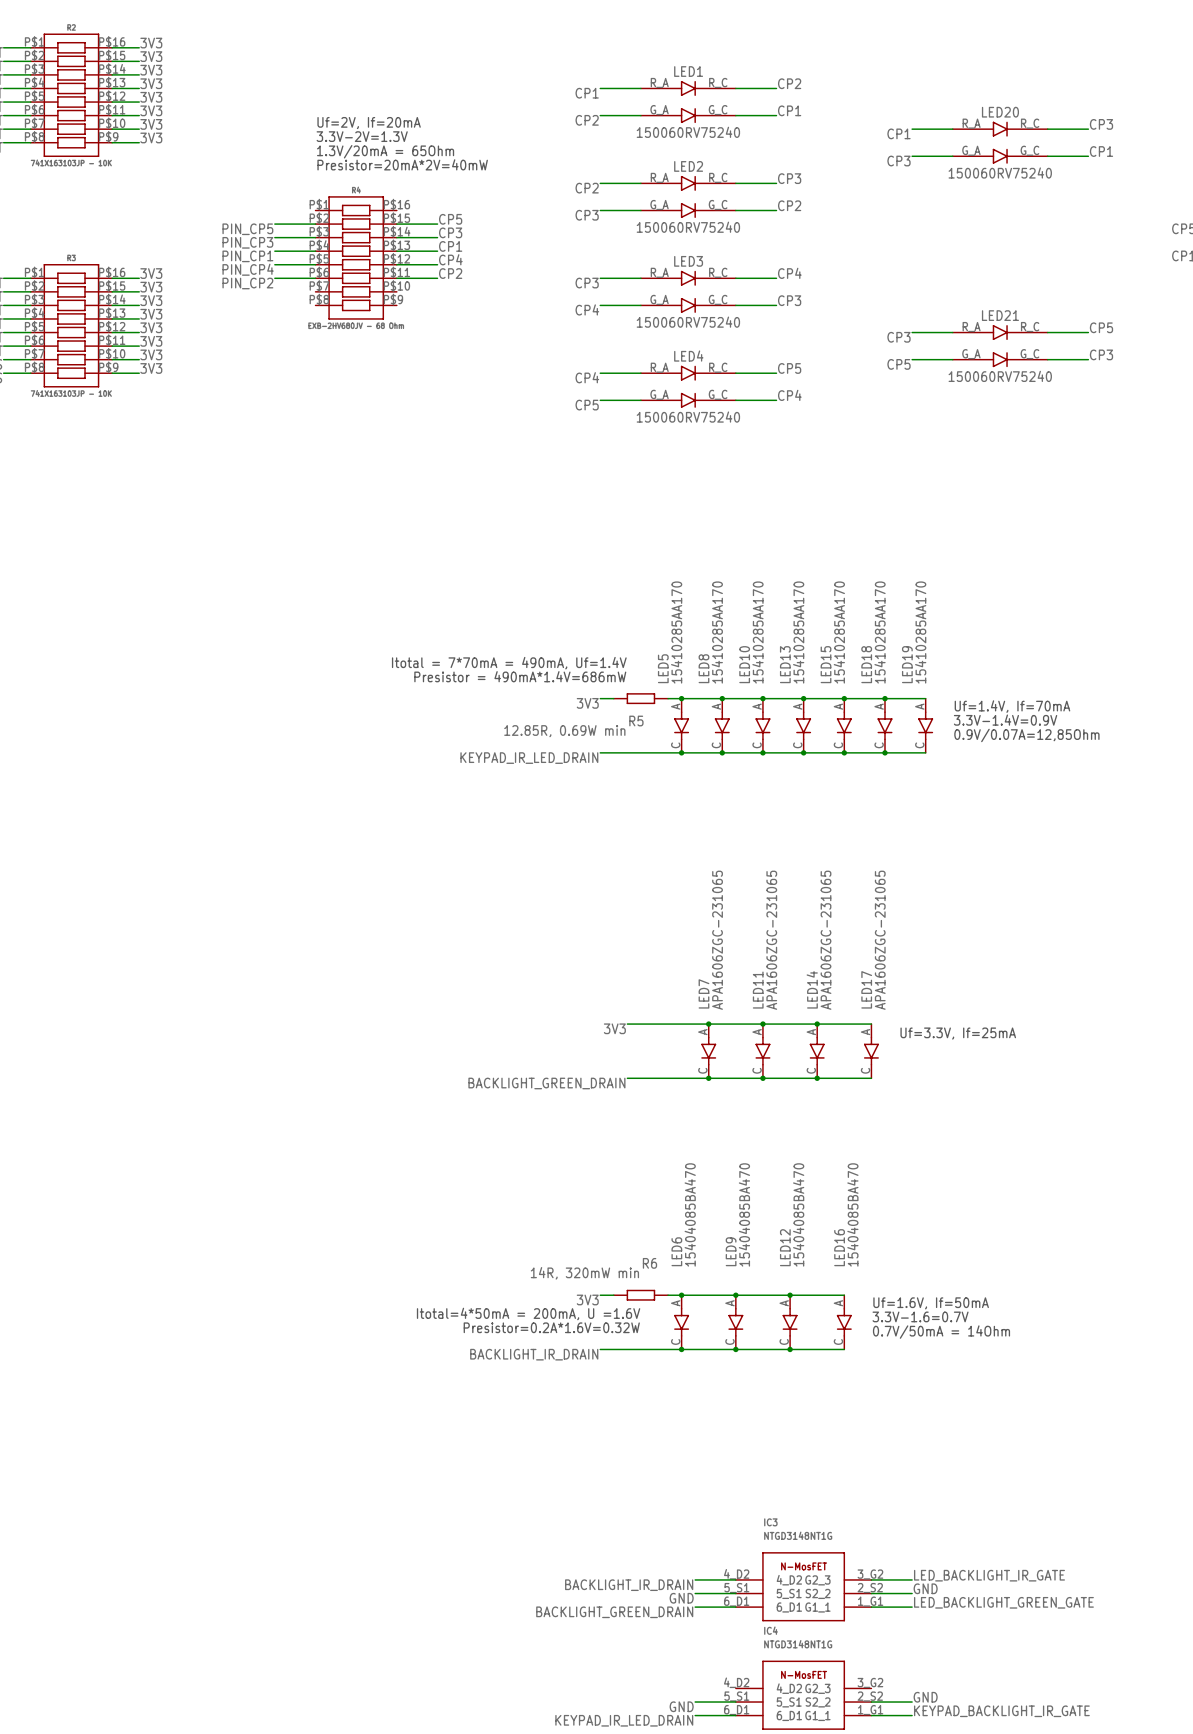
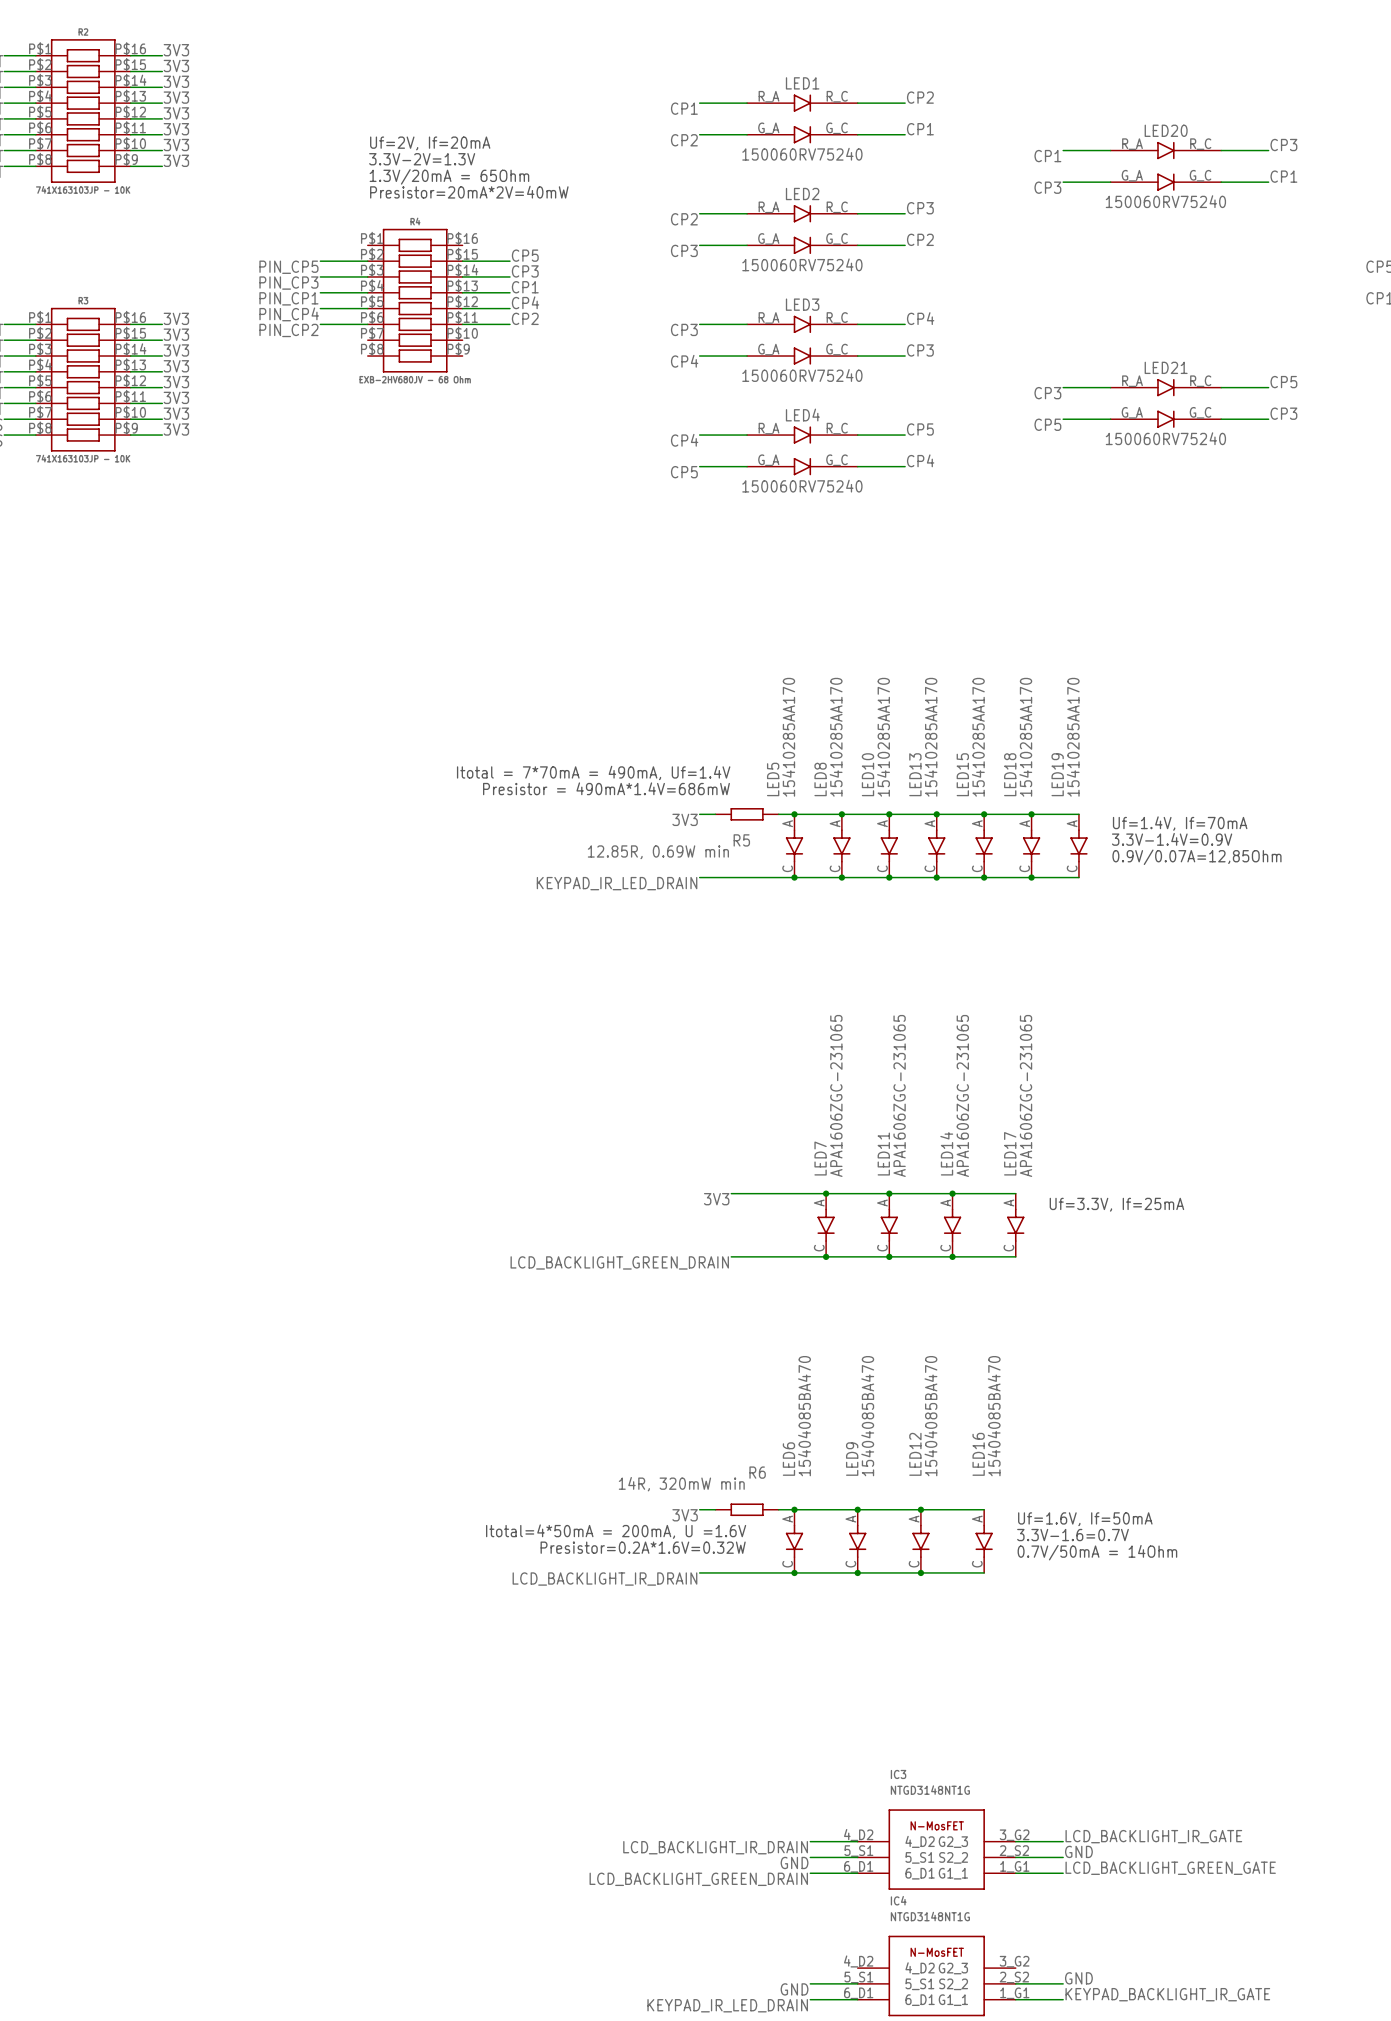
label: BACKLIGHT_GREEN_DRAIN (546, 1083) -> LCD_BACKLIGHT_GREEN_DRAIN (619, 1262)
label: BACKLIGHT_IR_DRAIN (534, 1354) -> LCD_BACKLIGHT_IR_DRAIN (604, 1579)
label: LED_BACKLIGHT_IR_GATE (989, 1575) -> LCD_BACKLIGHT_IR_GATE (1153, 1836)
label: BACKLIGHT_IR_DRAIN (629, 1585) -> LCD_BACKLIGHT_IR_DRAIN (715, 1847)
label: LED_BACKLIGHT_GREEN_GATE (1003, 1602) -> LCD_BACKLIGHT_GREEN_GATE (1170, 1868)
label: BACKLIGHT_GREEN_DRAIN (614, 1612) -> LCD_BACKLIGHT_GREEN_DRAIN (698, 1879)

